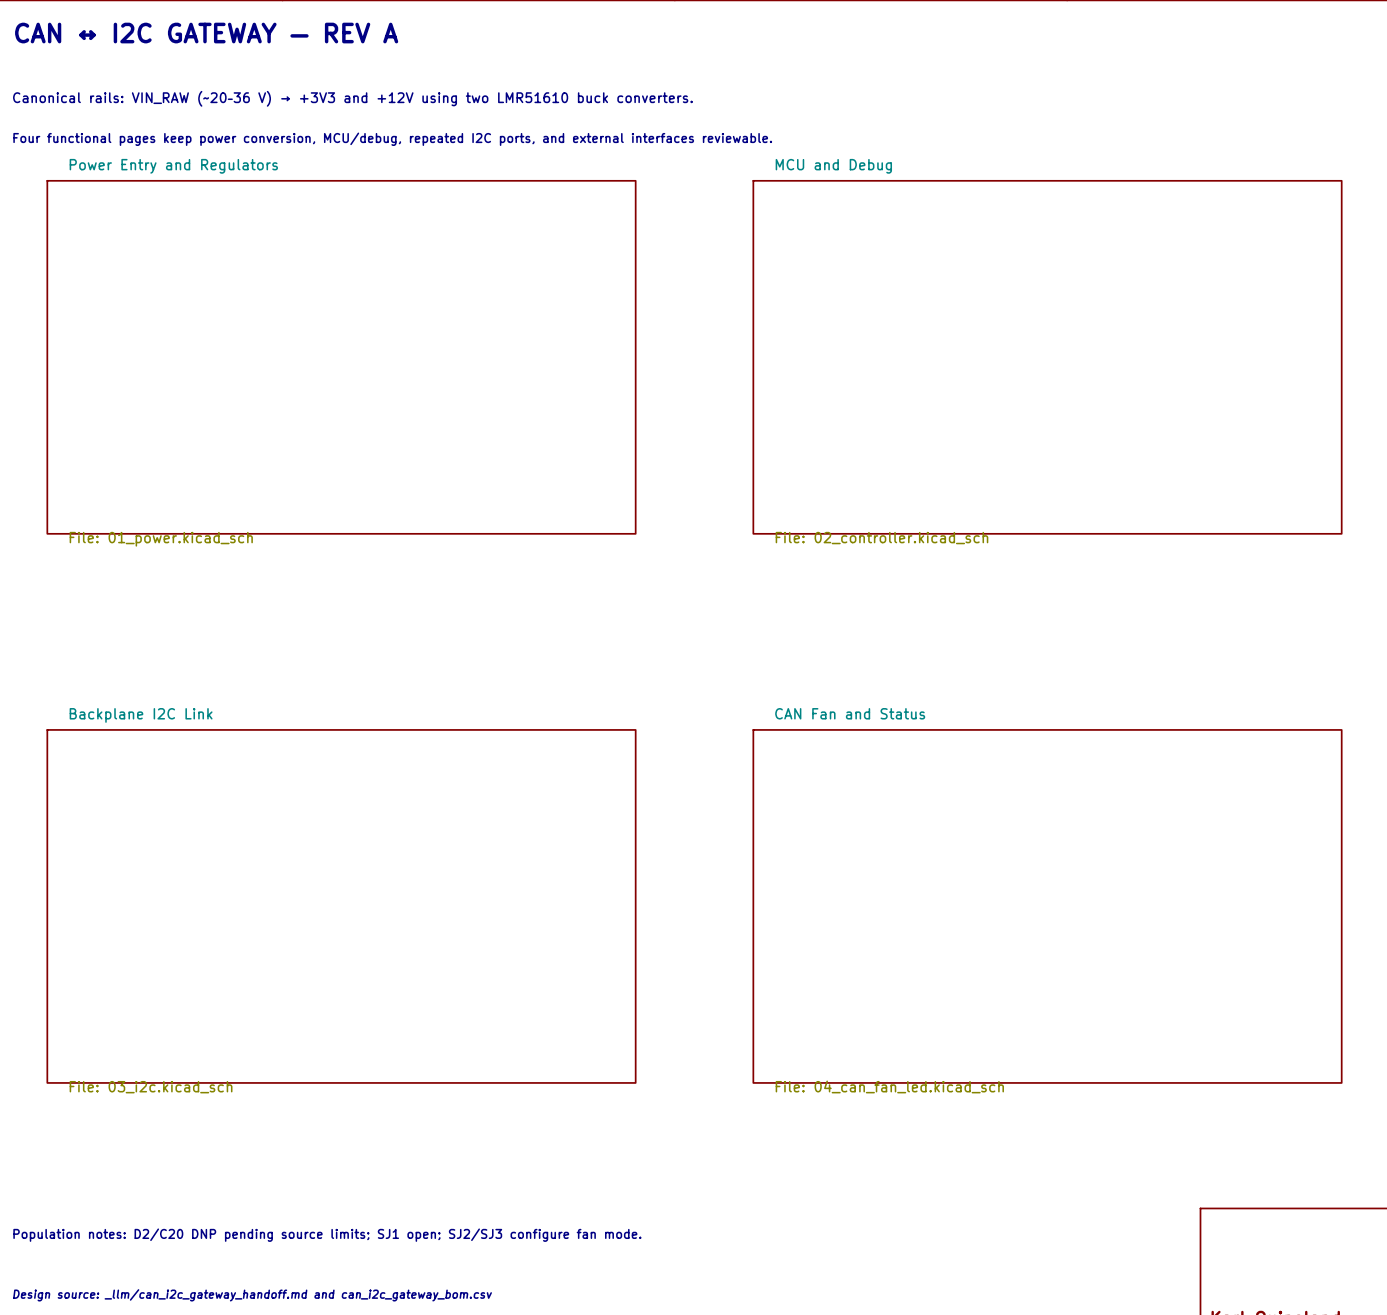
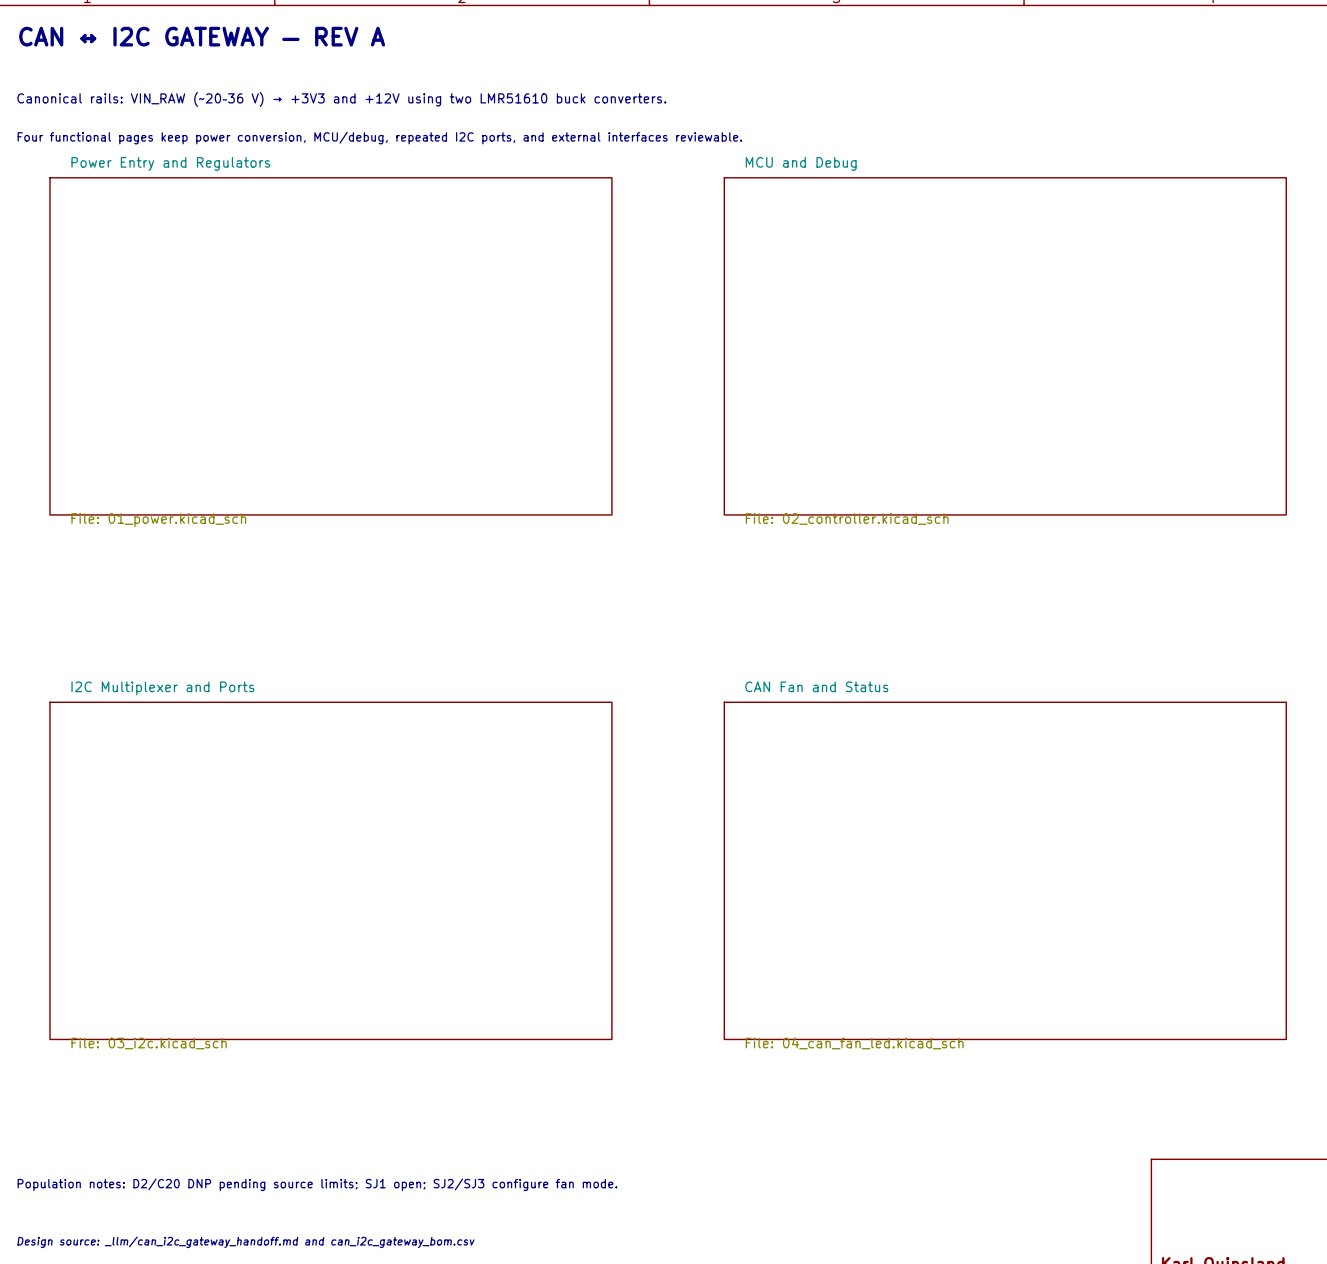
sheet Backplane I2C Link name: Backplane I2C Link (141, 715) -> I2C Multiplexer and Ports (162, 688)

